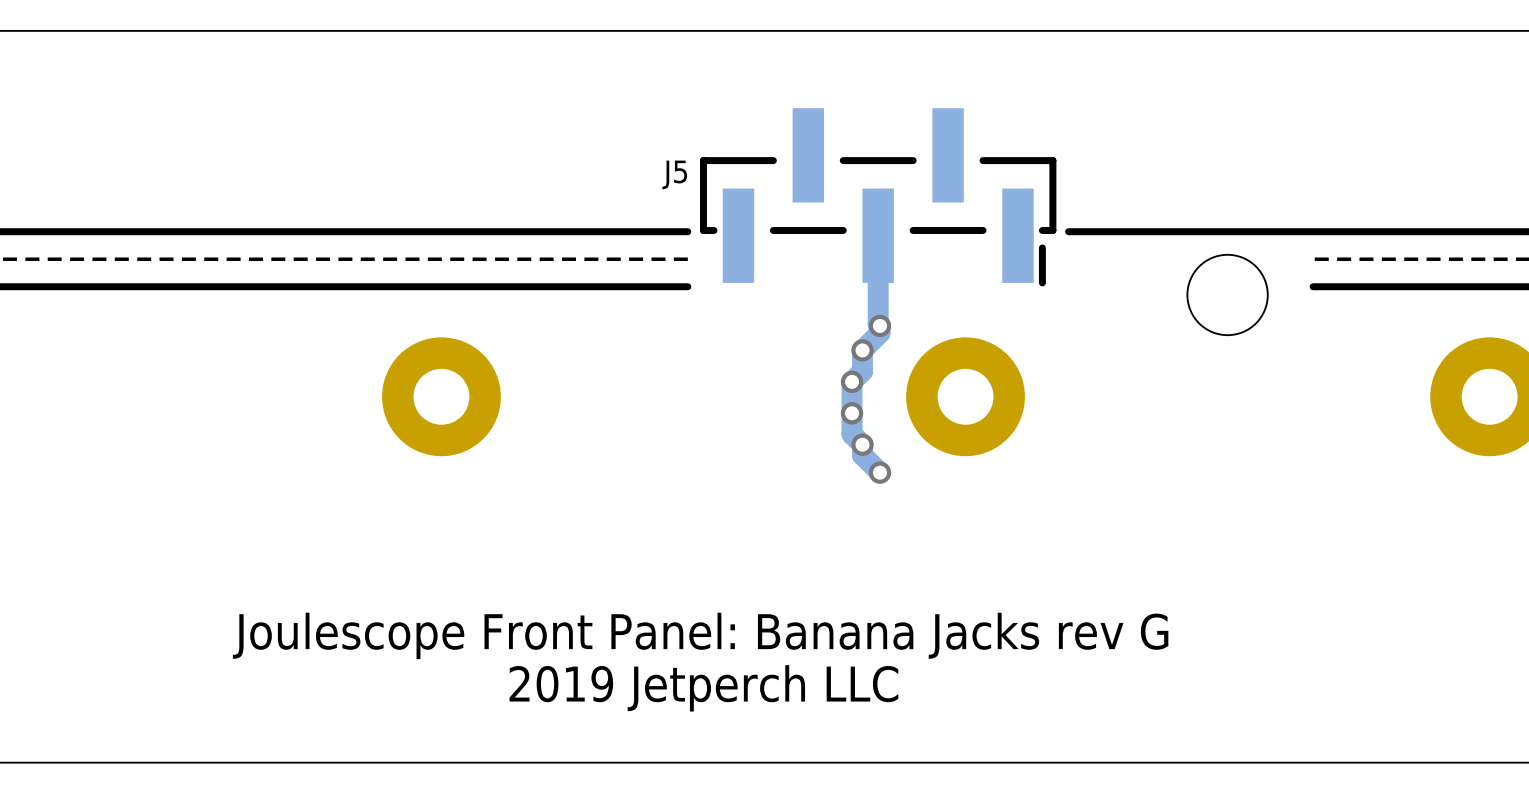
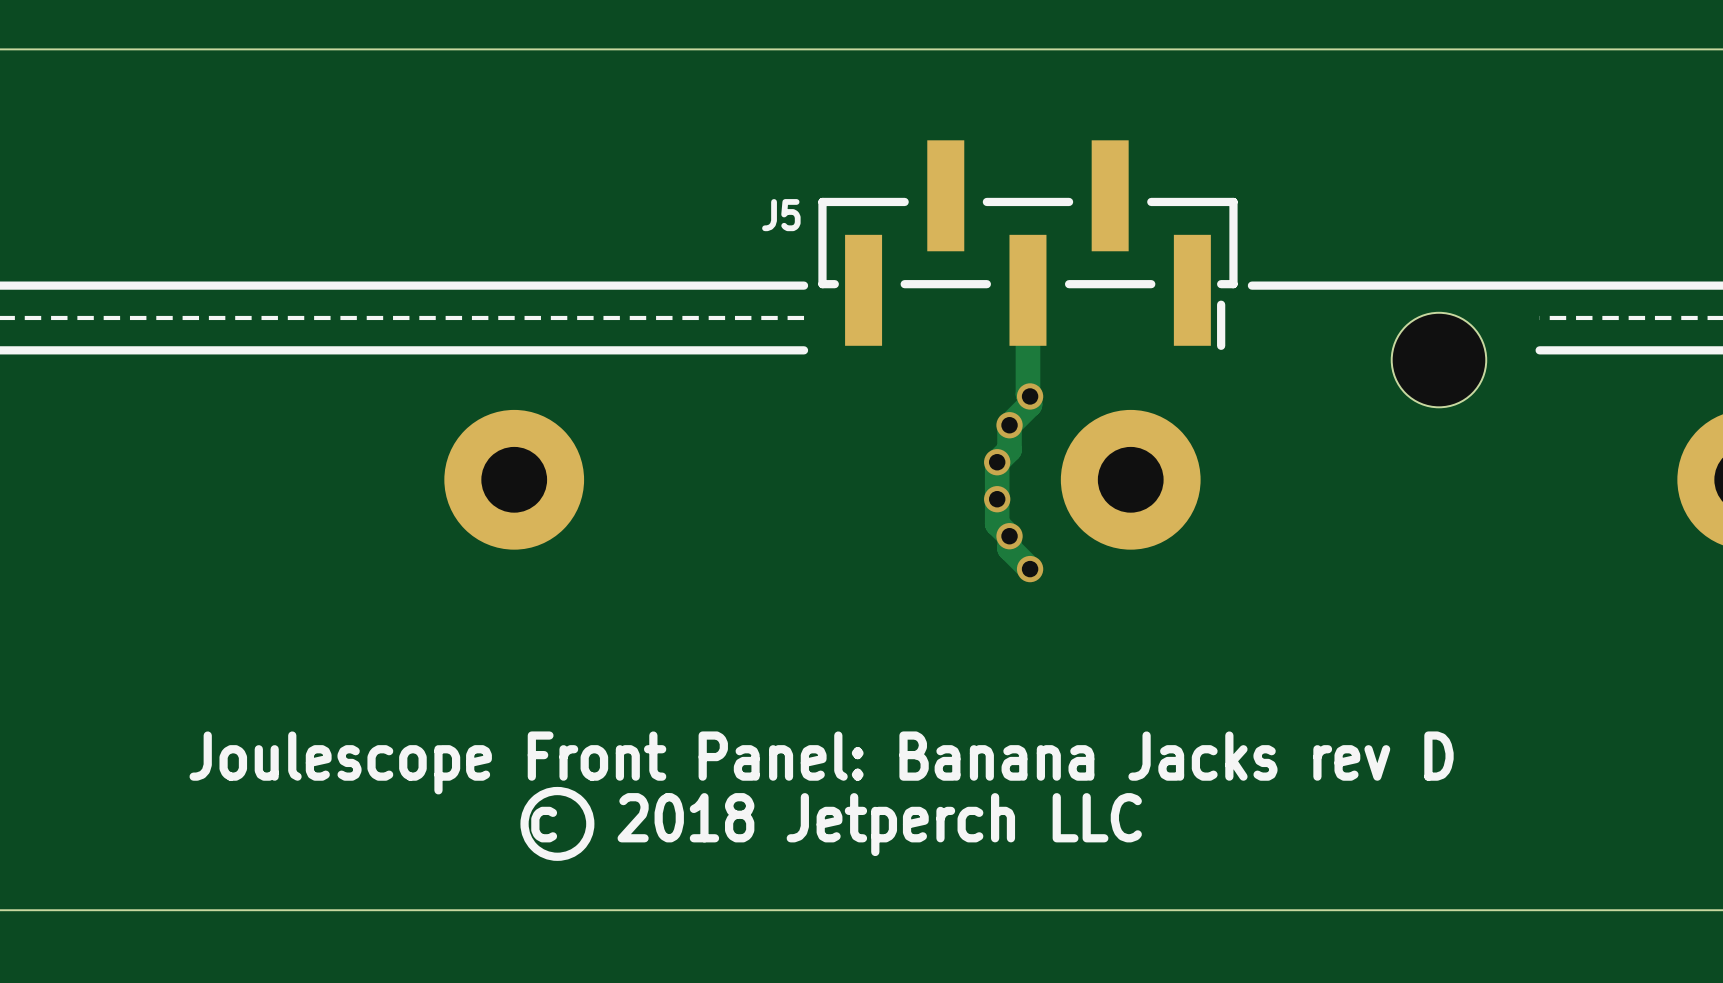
text: Joulescope Front Panel: Banana Jacks rev G (700, 635) -> Joulescope Front Panel: Banana Jacks rev D (821, 762)
drawing: none -> [520, 786, 595, 861]
text: 2019 Jetperch LLC (703, 688) -> c 2018 Jetperch LLC (836, 824)

